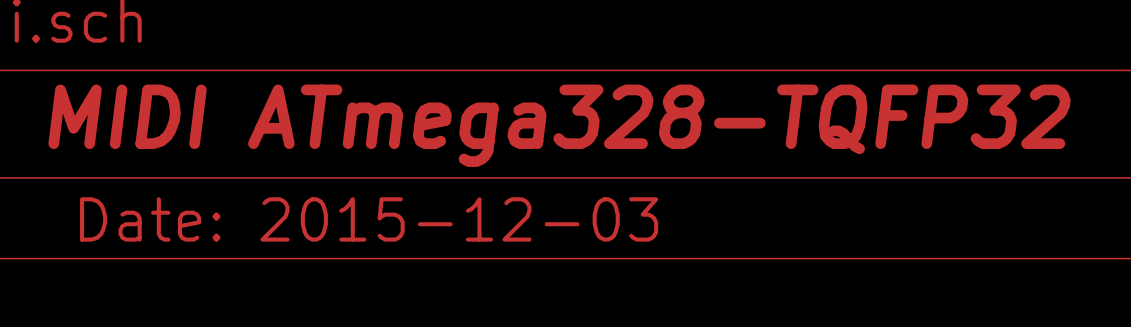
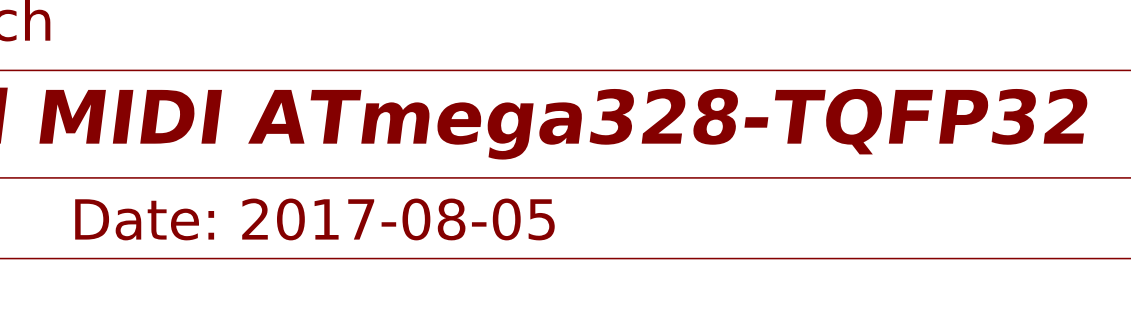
title block: Date: 2015-12-03 (369, 219) -> Date: 2017-08-05 (314, 219)

